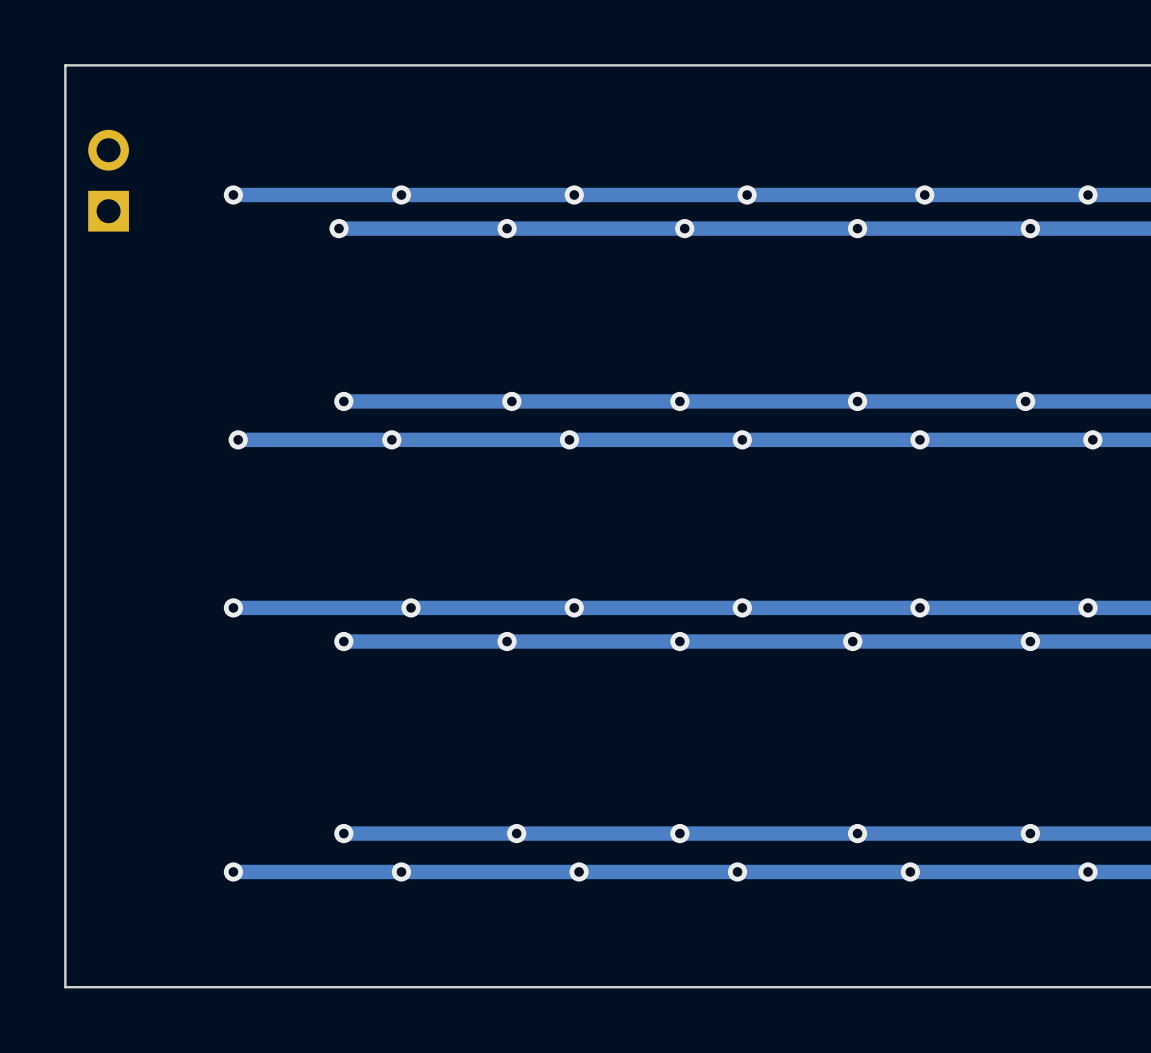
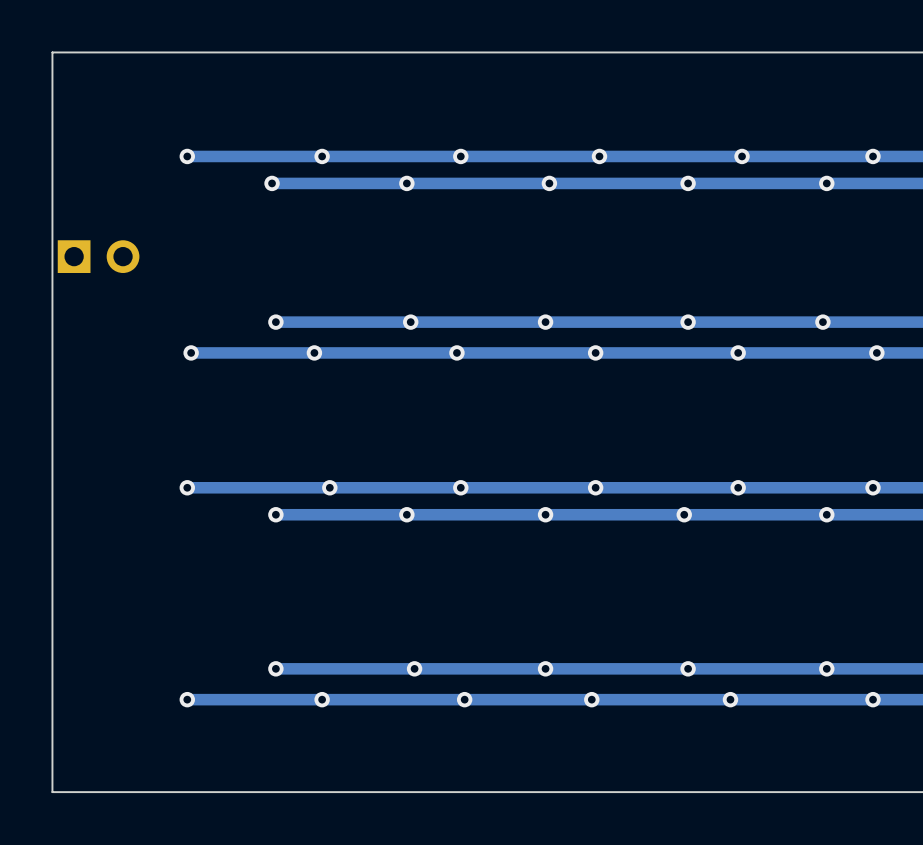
part rotation: 0° (108, 180) -> 90° clockwise (98, 256)
part position: (108, 180) -> (98, 256)

